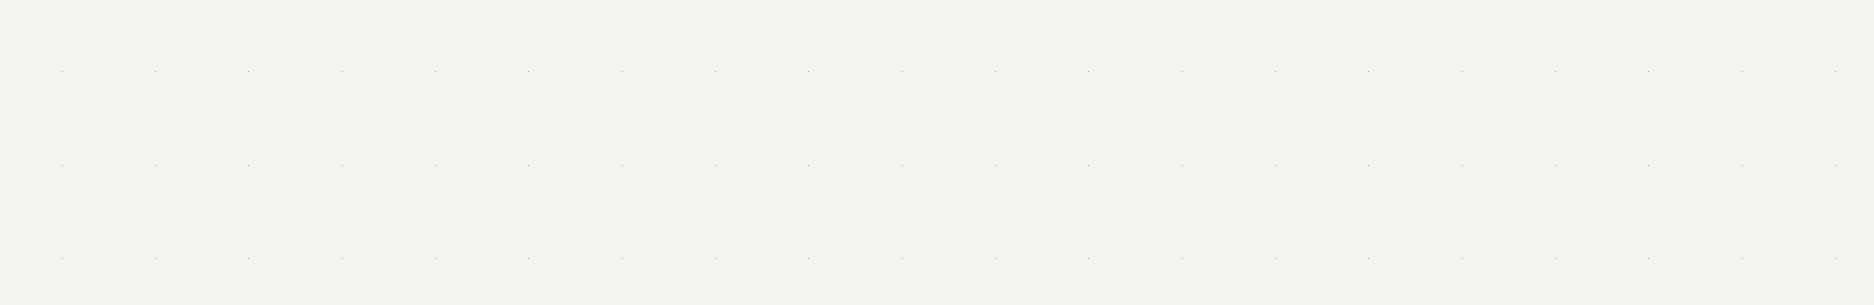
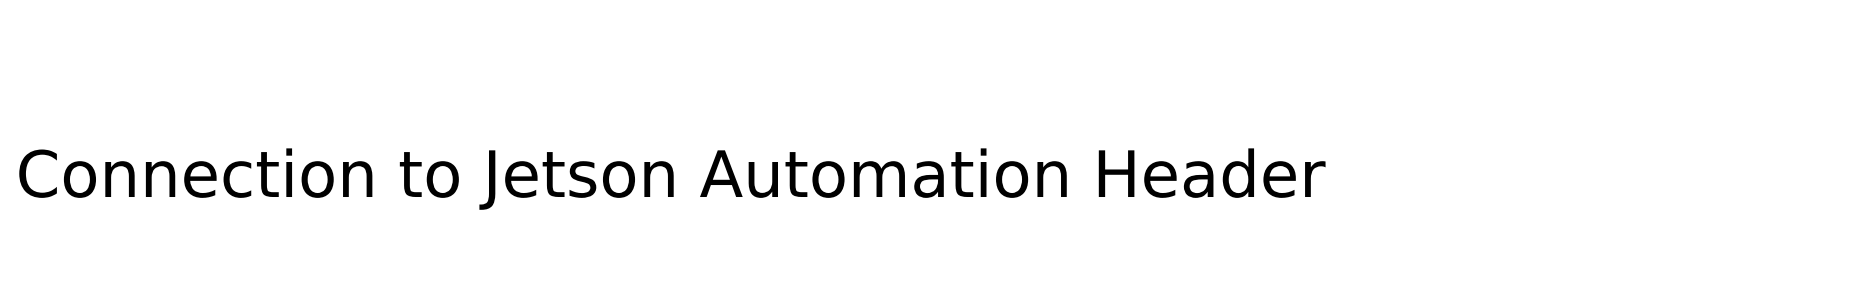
text: none -> Connection to Jetson Automation Header (672, 179)

